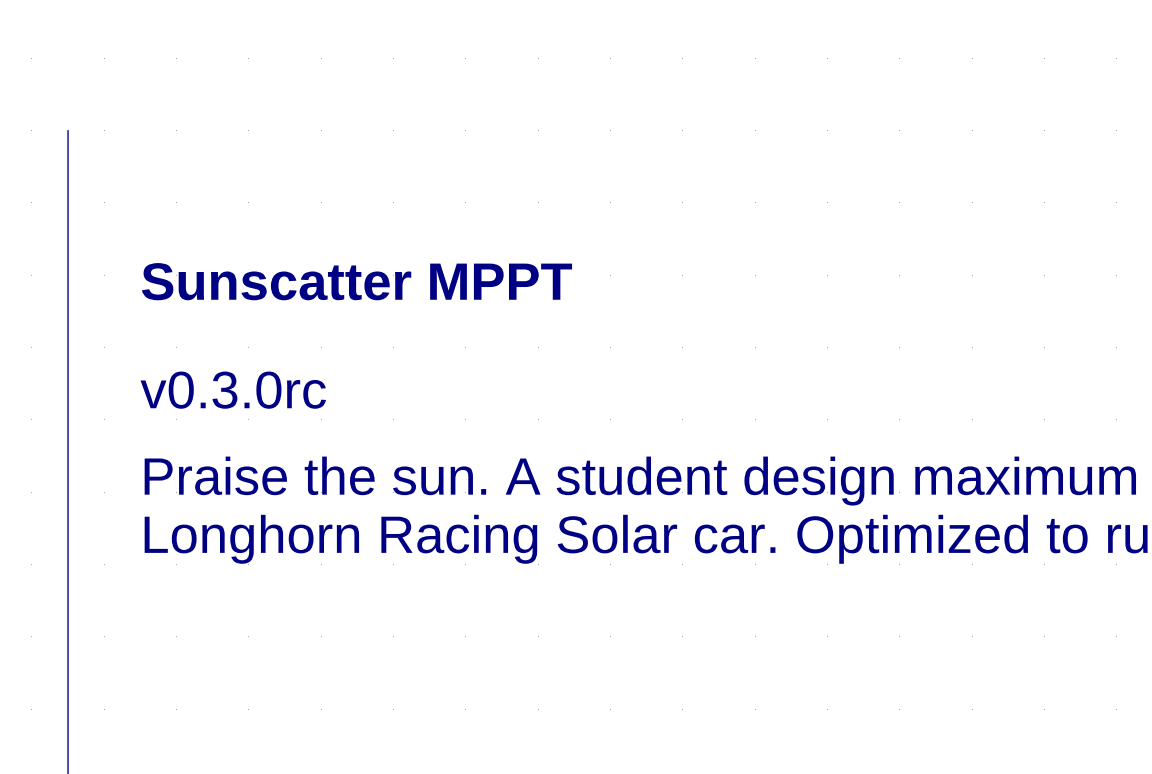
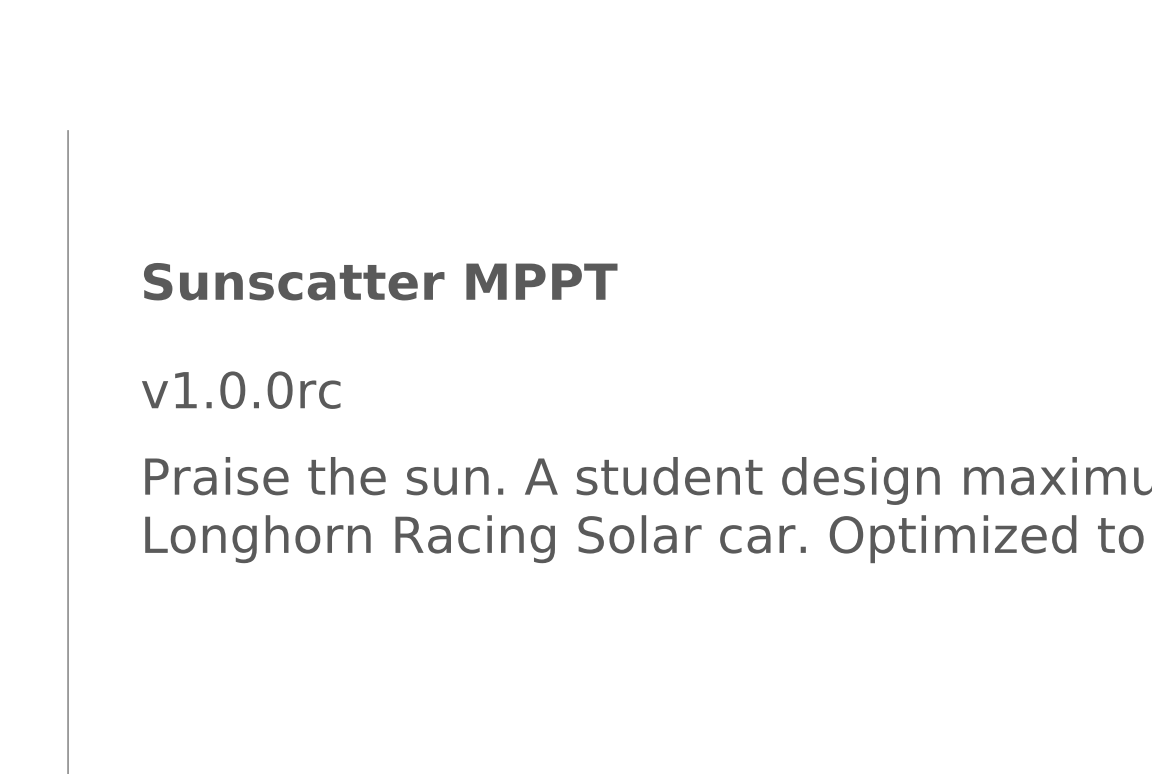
text: v0.3.0rc (233, 390) -> v1.0.0rc (241, 390)

